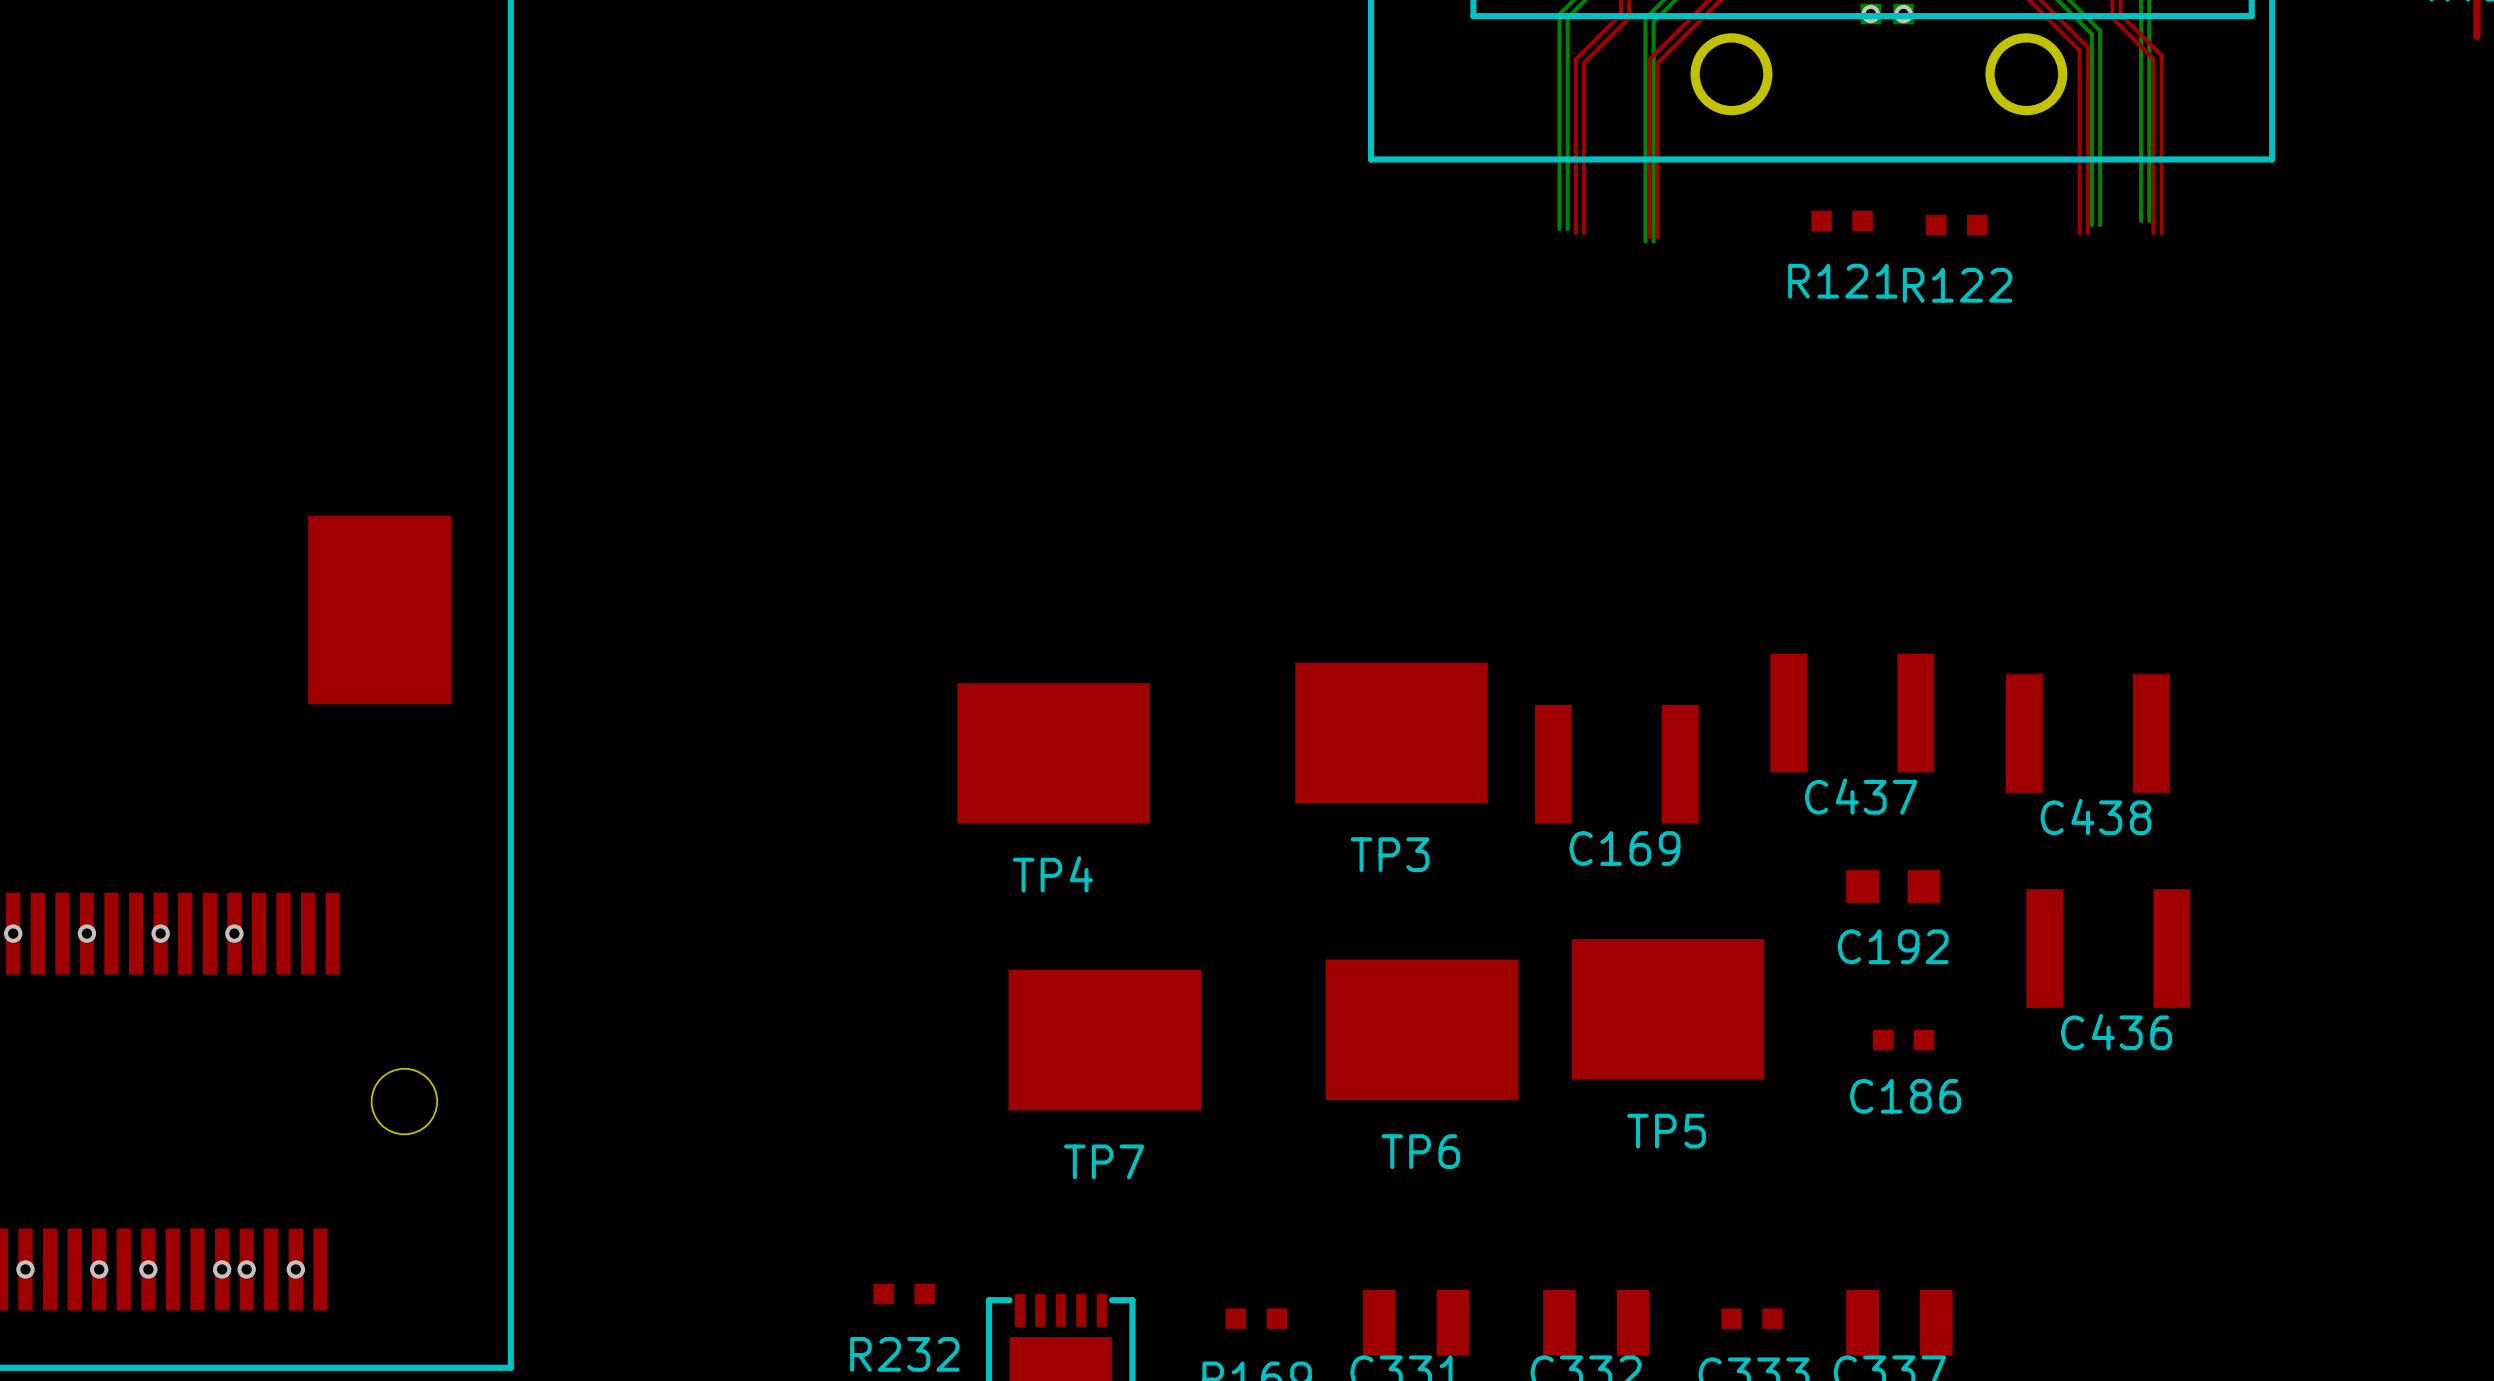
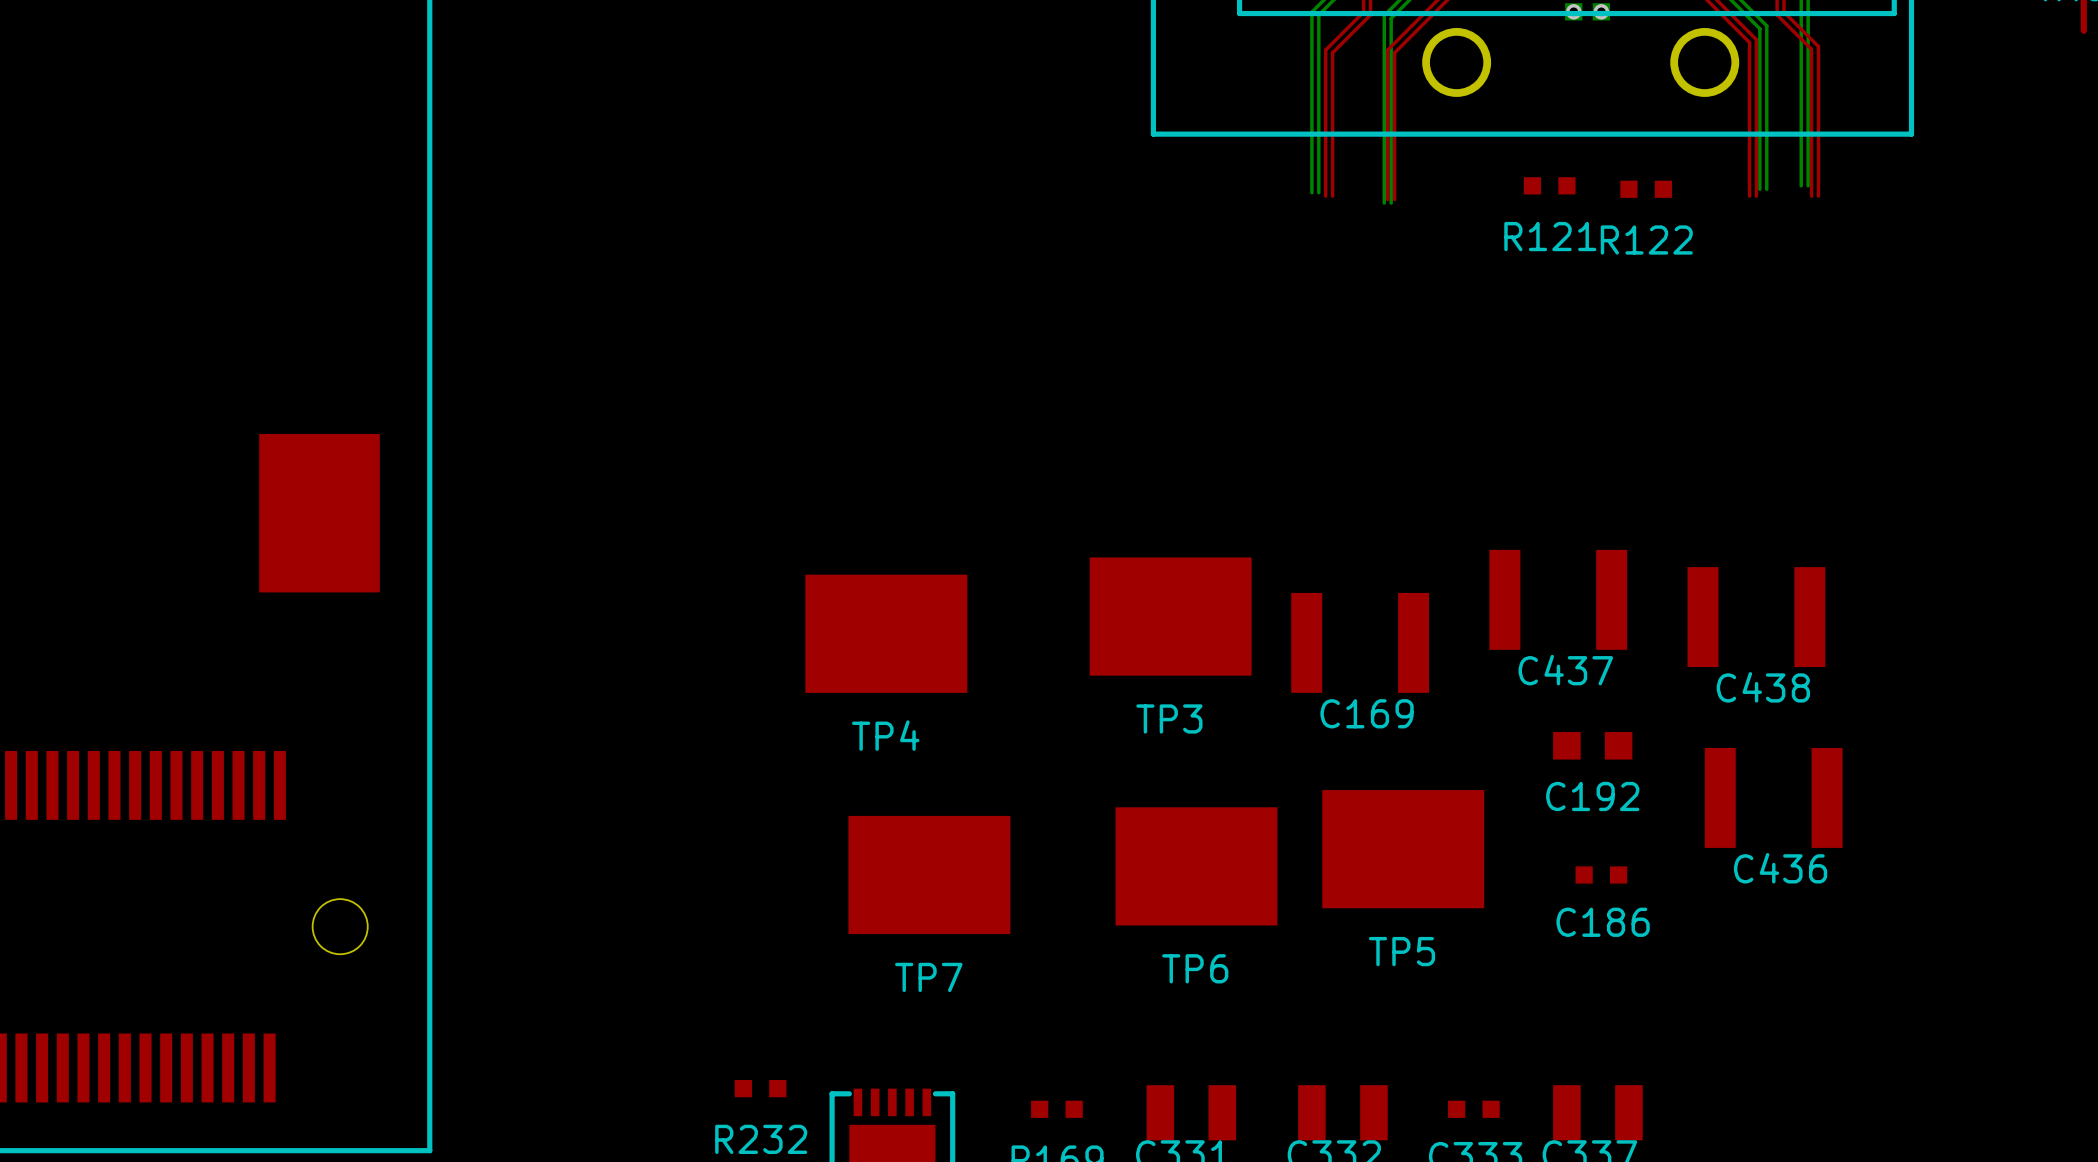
via: (13, 933) -> none
via: (86, 933) -> none
via: (160, 933) -> none
via: (234, 933) -> none
via: (25, 1269) -> none
via: (99, 1269) -> none
via: (148, 1269) -> none
via: (222, 1269) -> none
via: (246, 1269) -> none
via: (295, 1269) -> none

